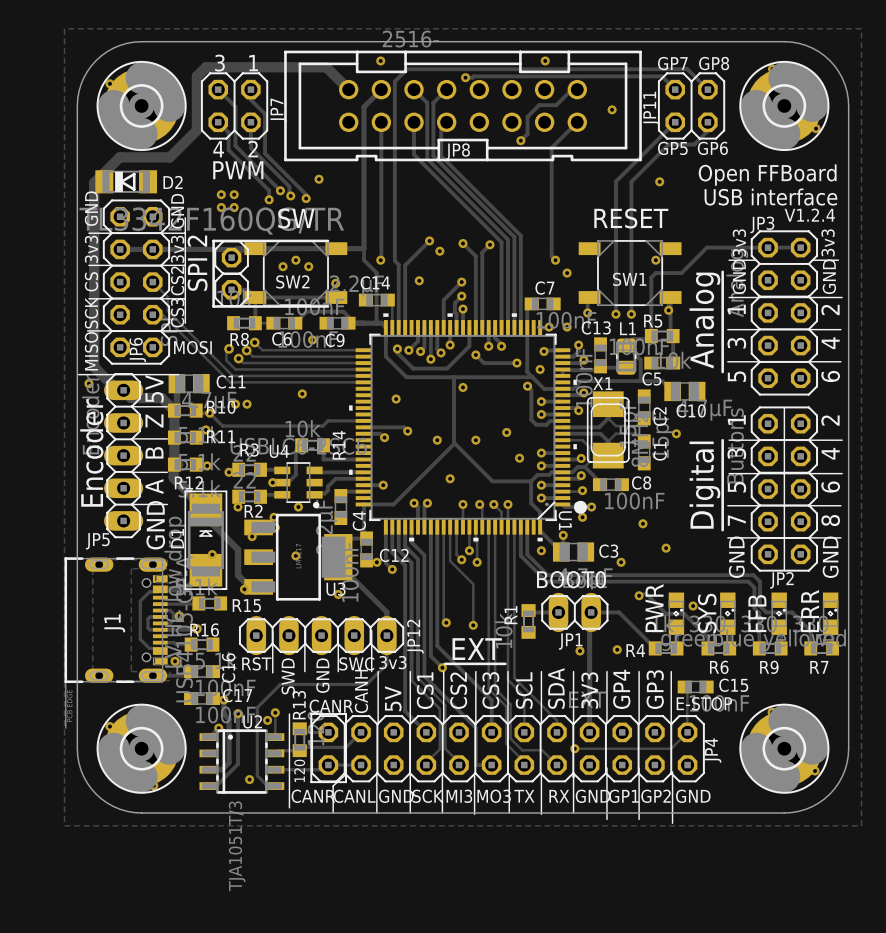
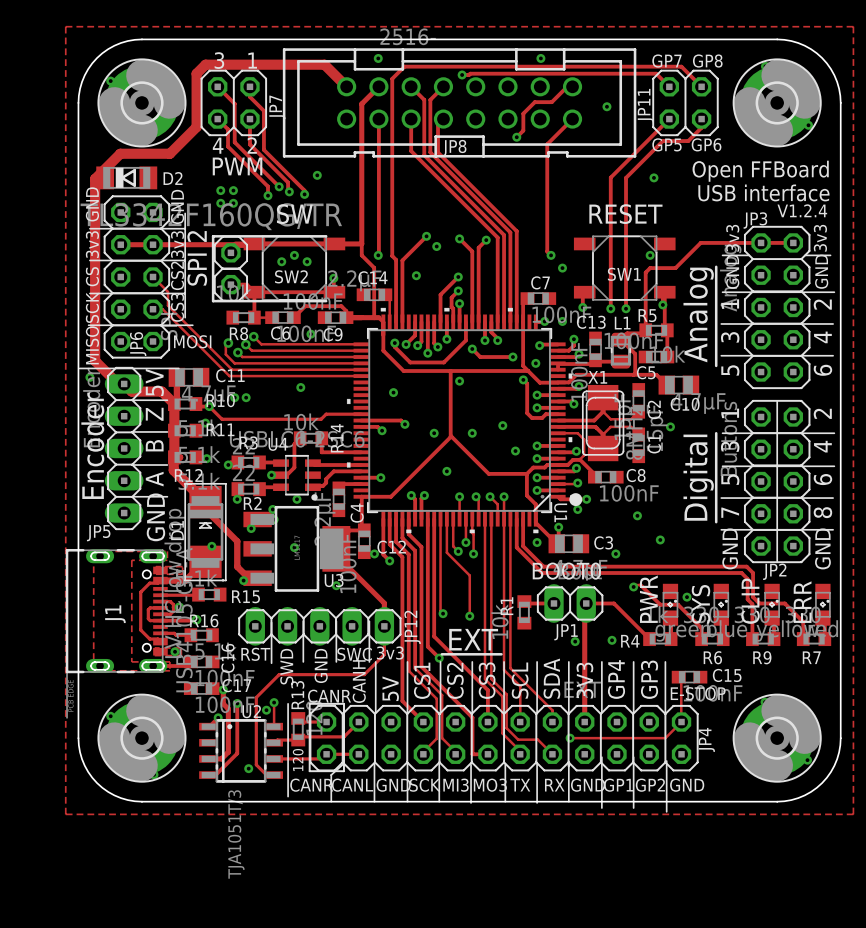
text: FFB (757, 613) -> CLIP (750, 601)

